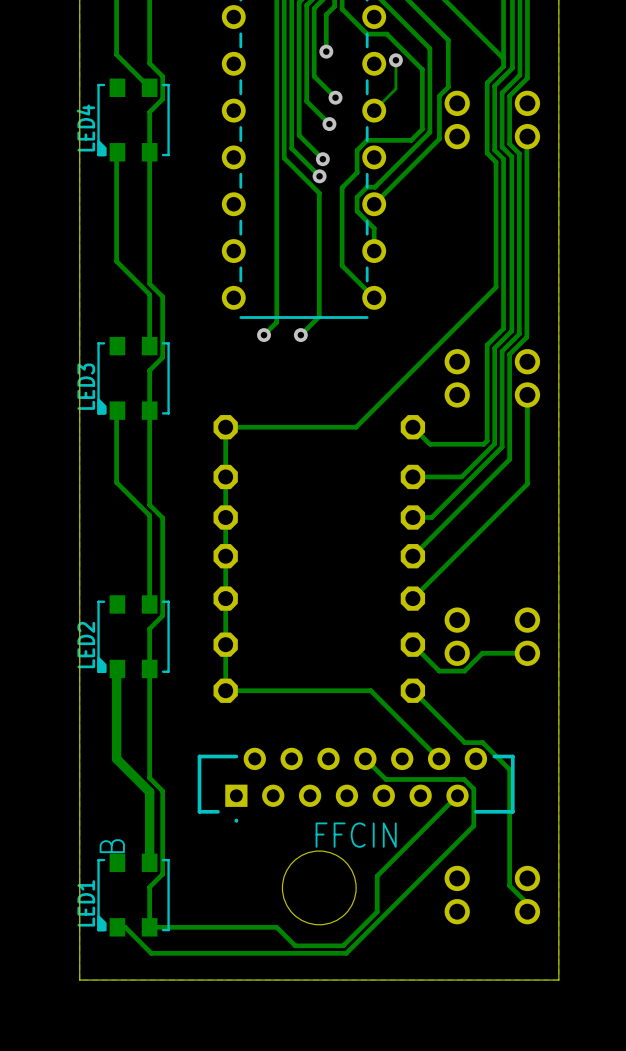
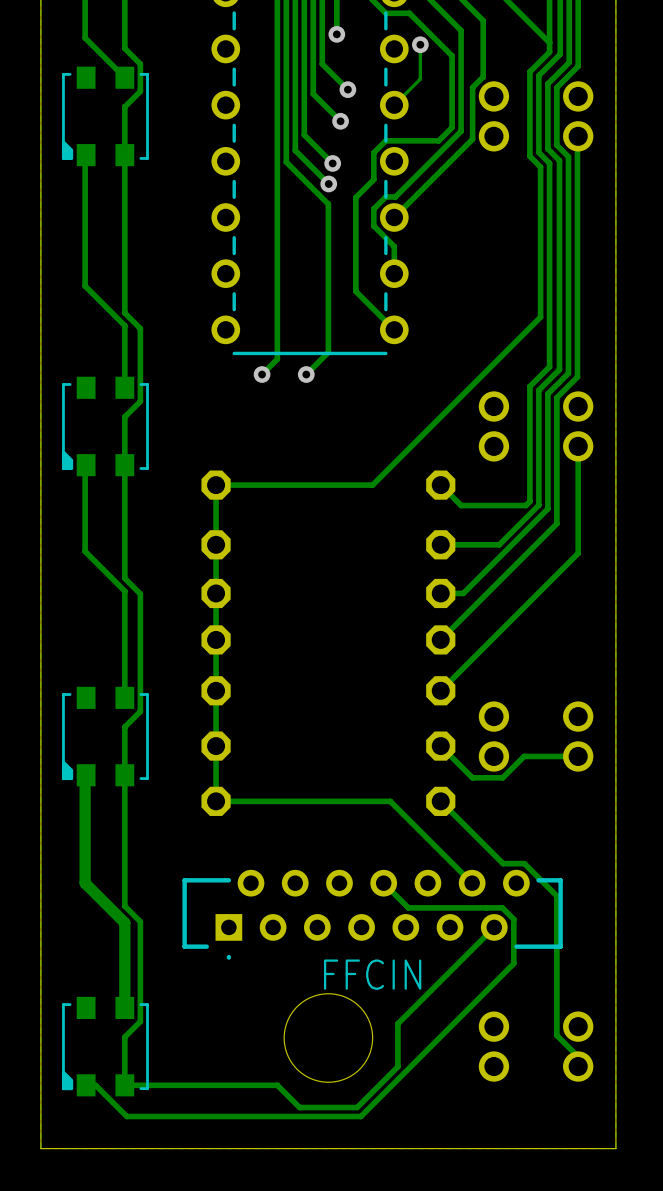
LED4 name: LED4 (85, 127) -> none
LED3 name: LED3 (86, 386) -> none
LED2 name: LED2 (86, 645) -> none
text: B (112, 846) -> none
LED1 name: LED1 (86, 903) -> none

